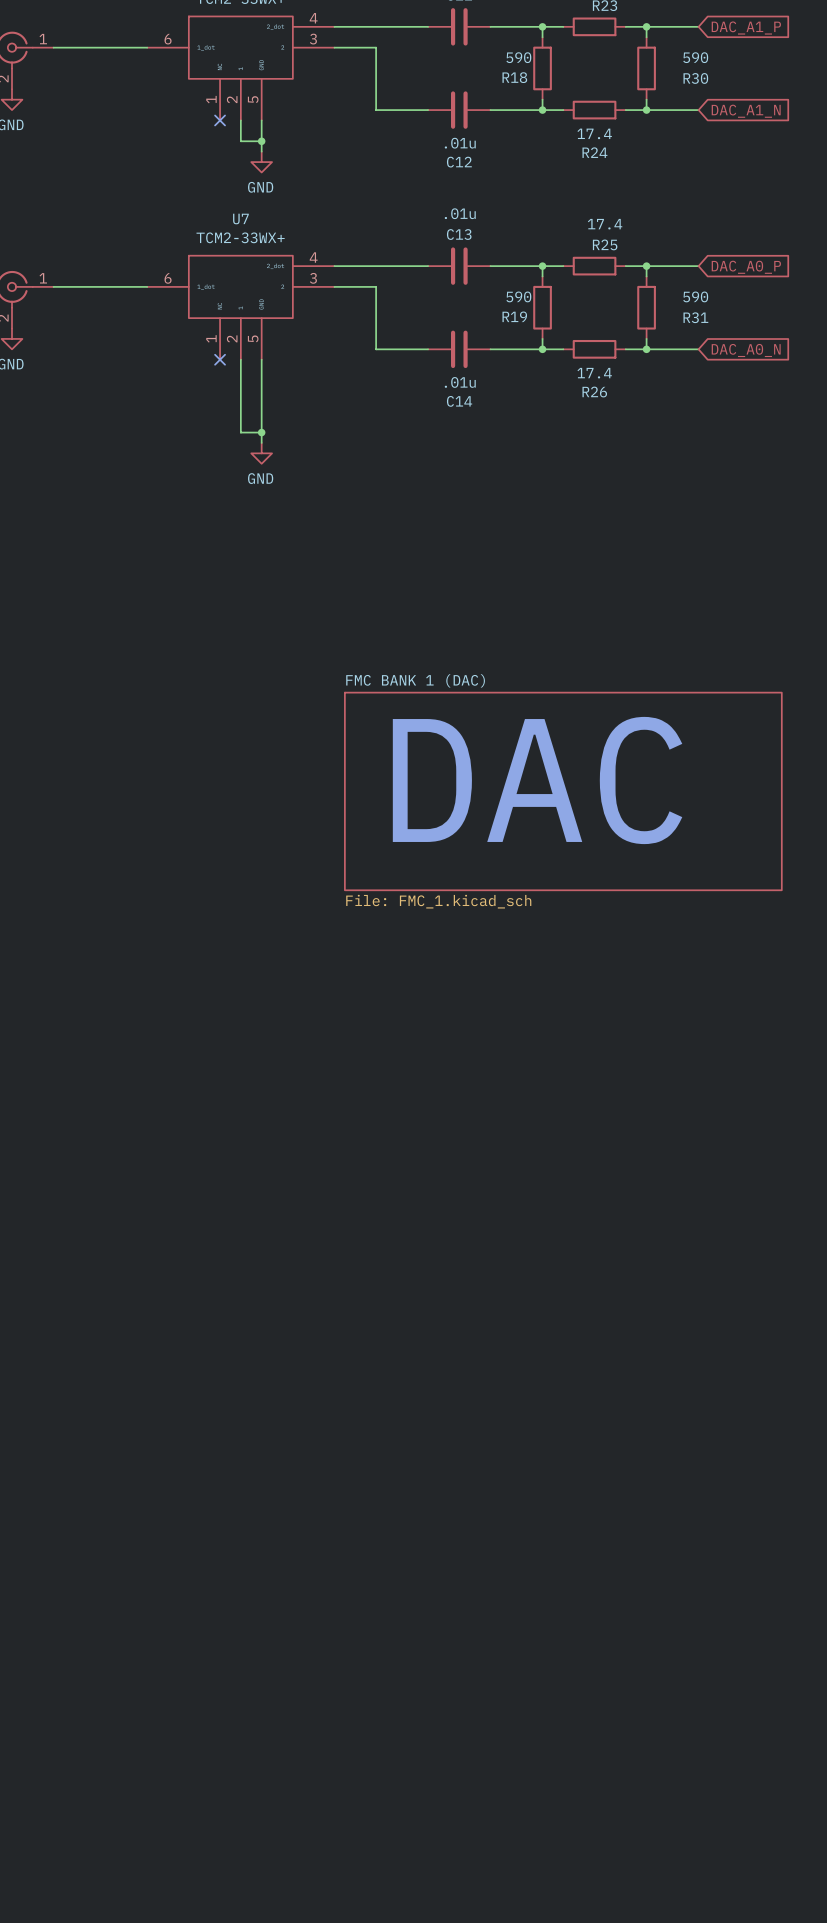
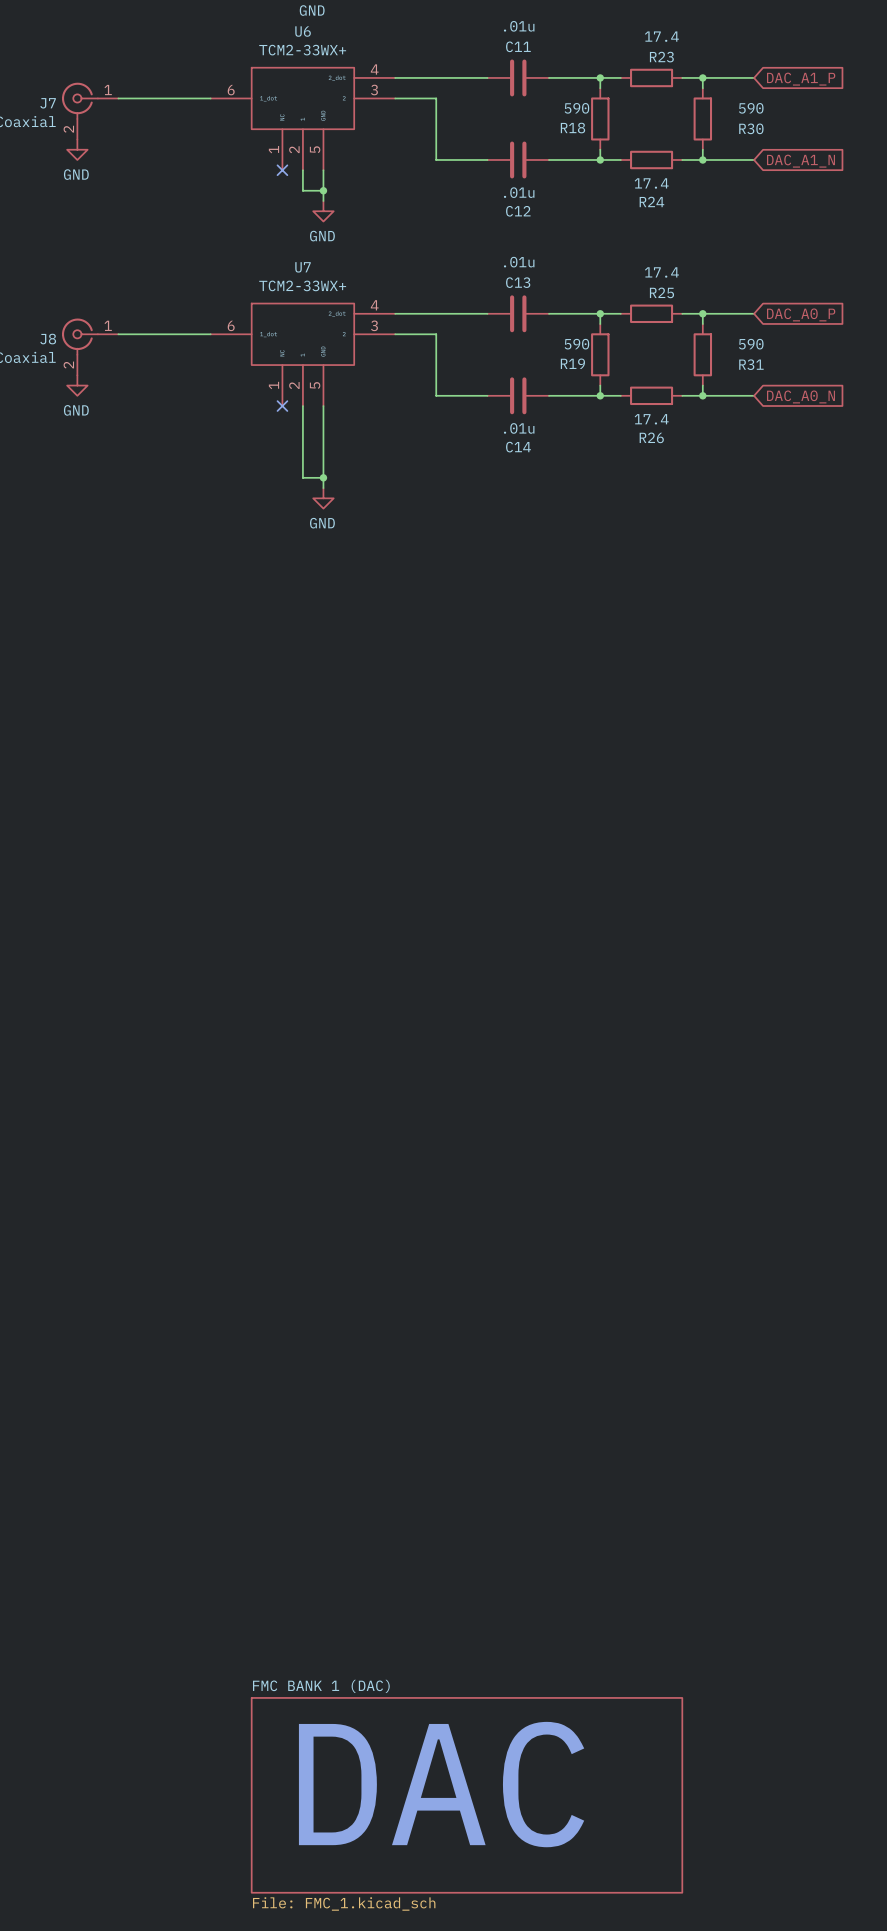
text: DAC (537, 780) -> none
sheet FMC BANK 1 (DAC) position: (563, 791) -> (466, 1795)
text: none -> DAC (441, 1784)

